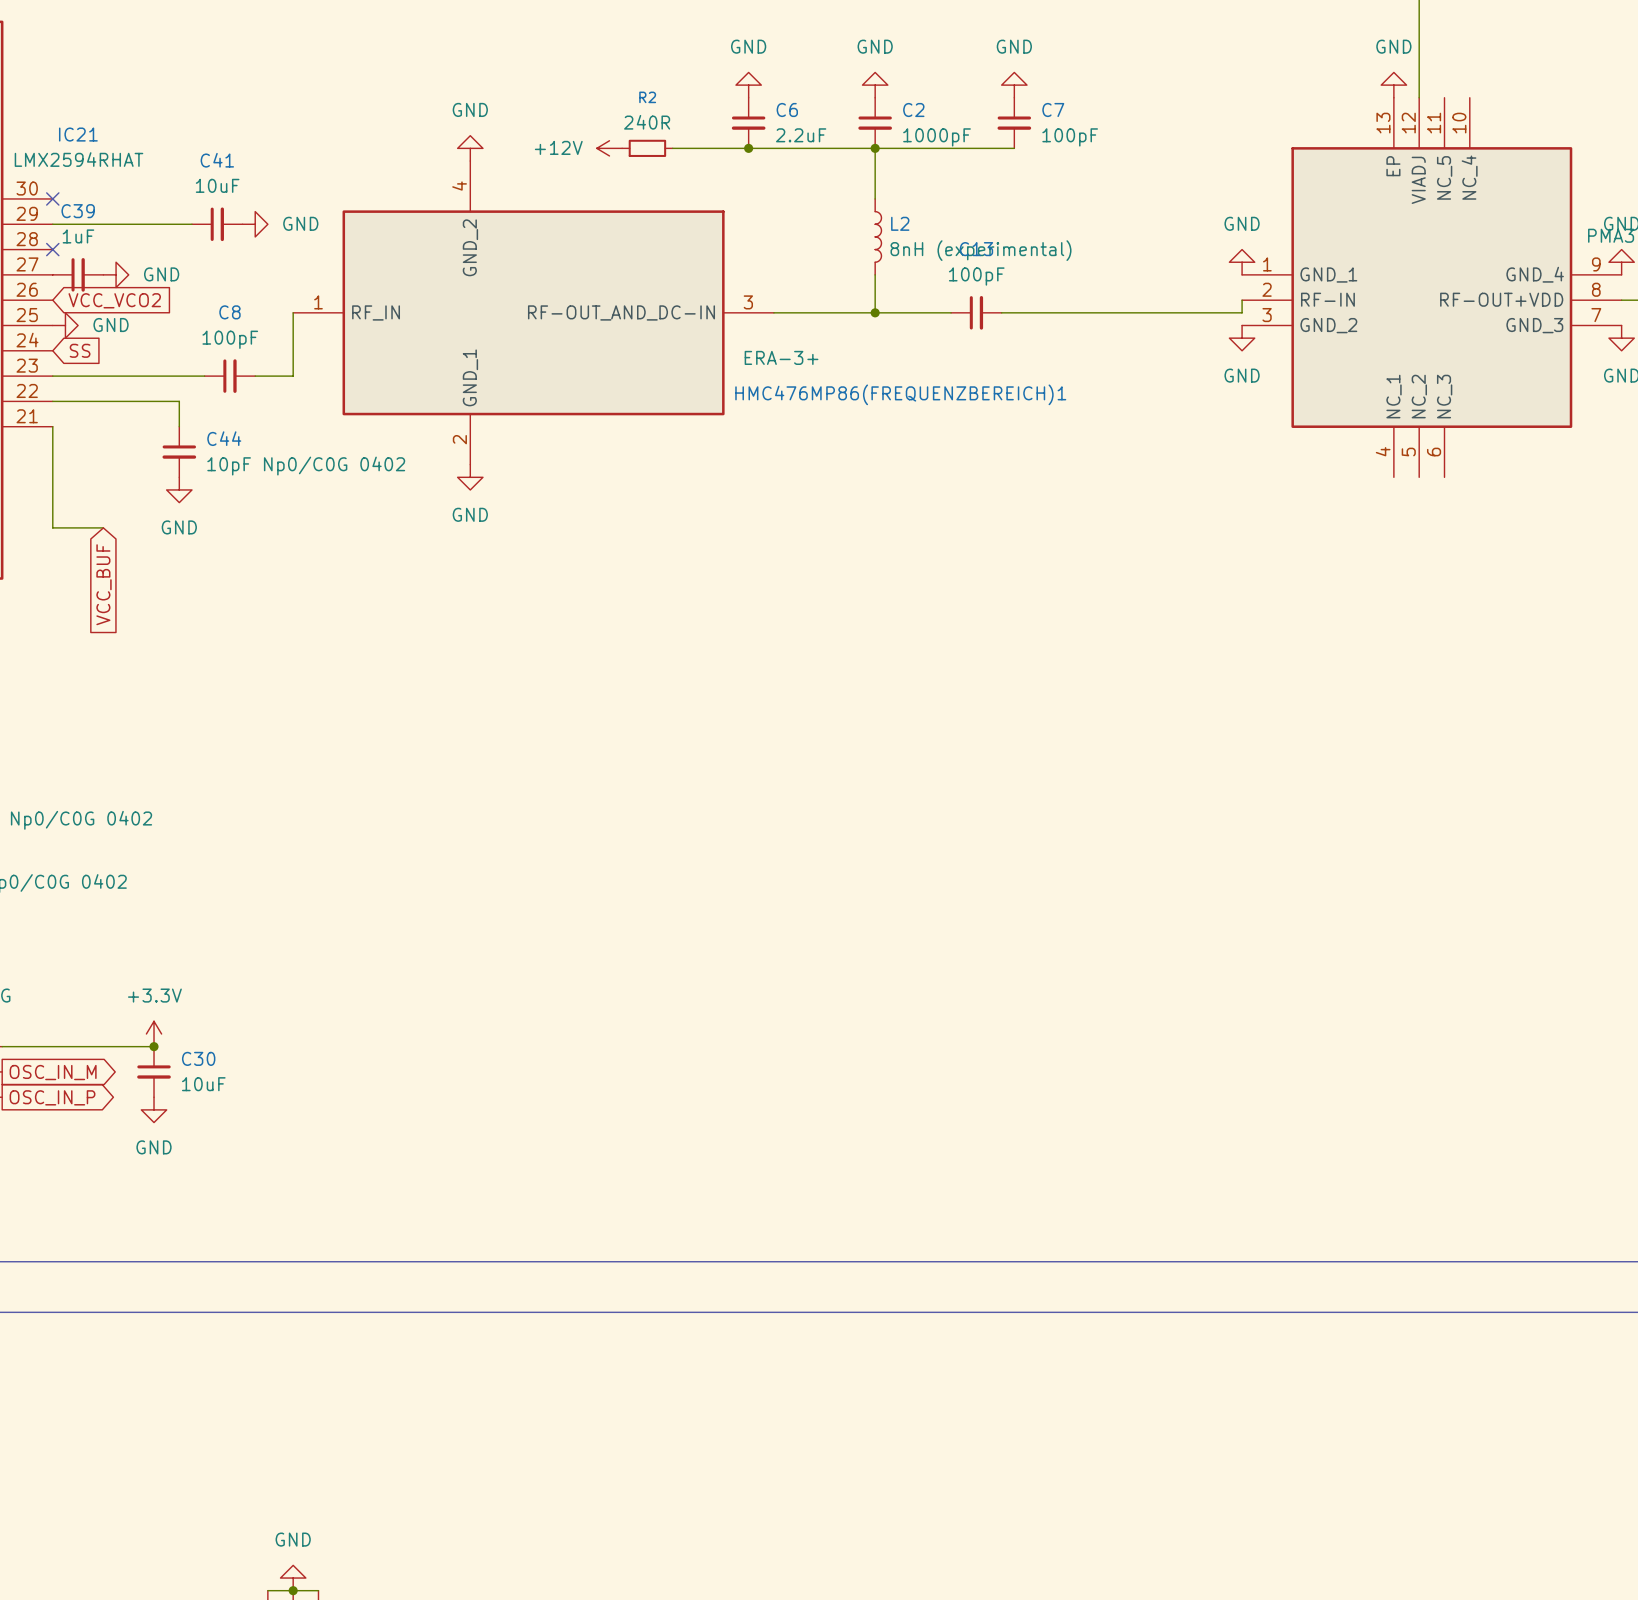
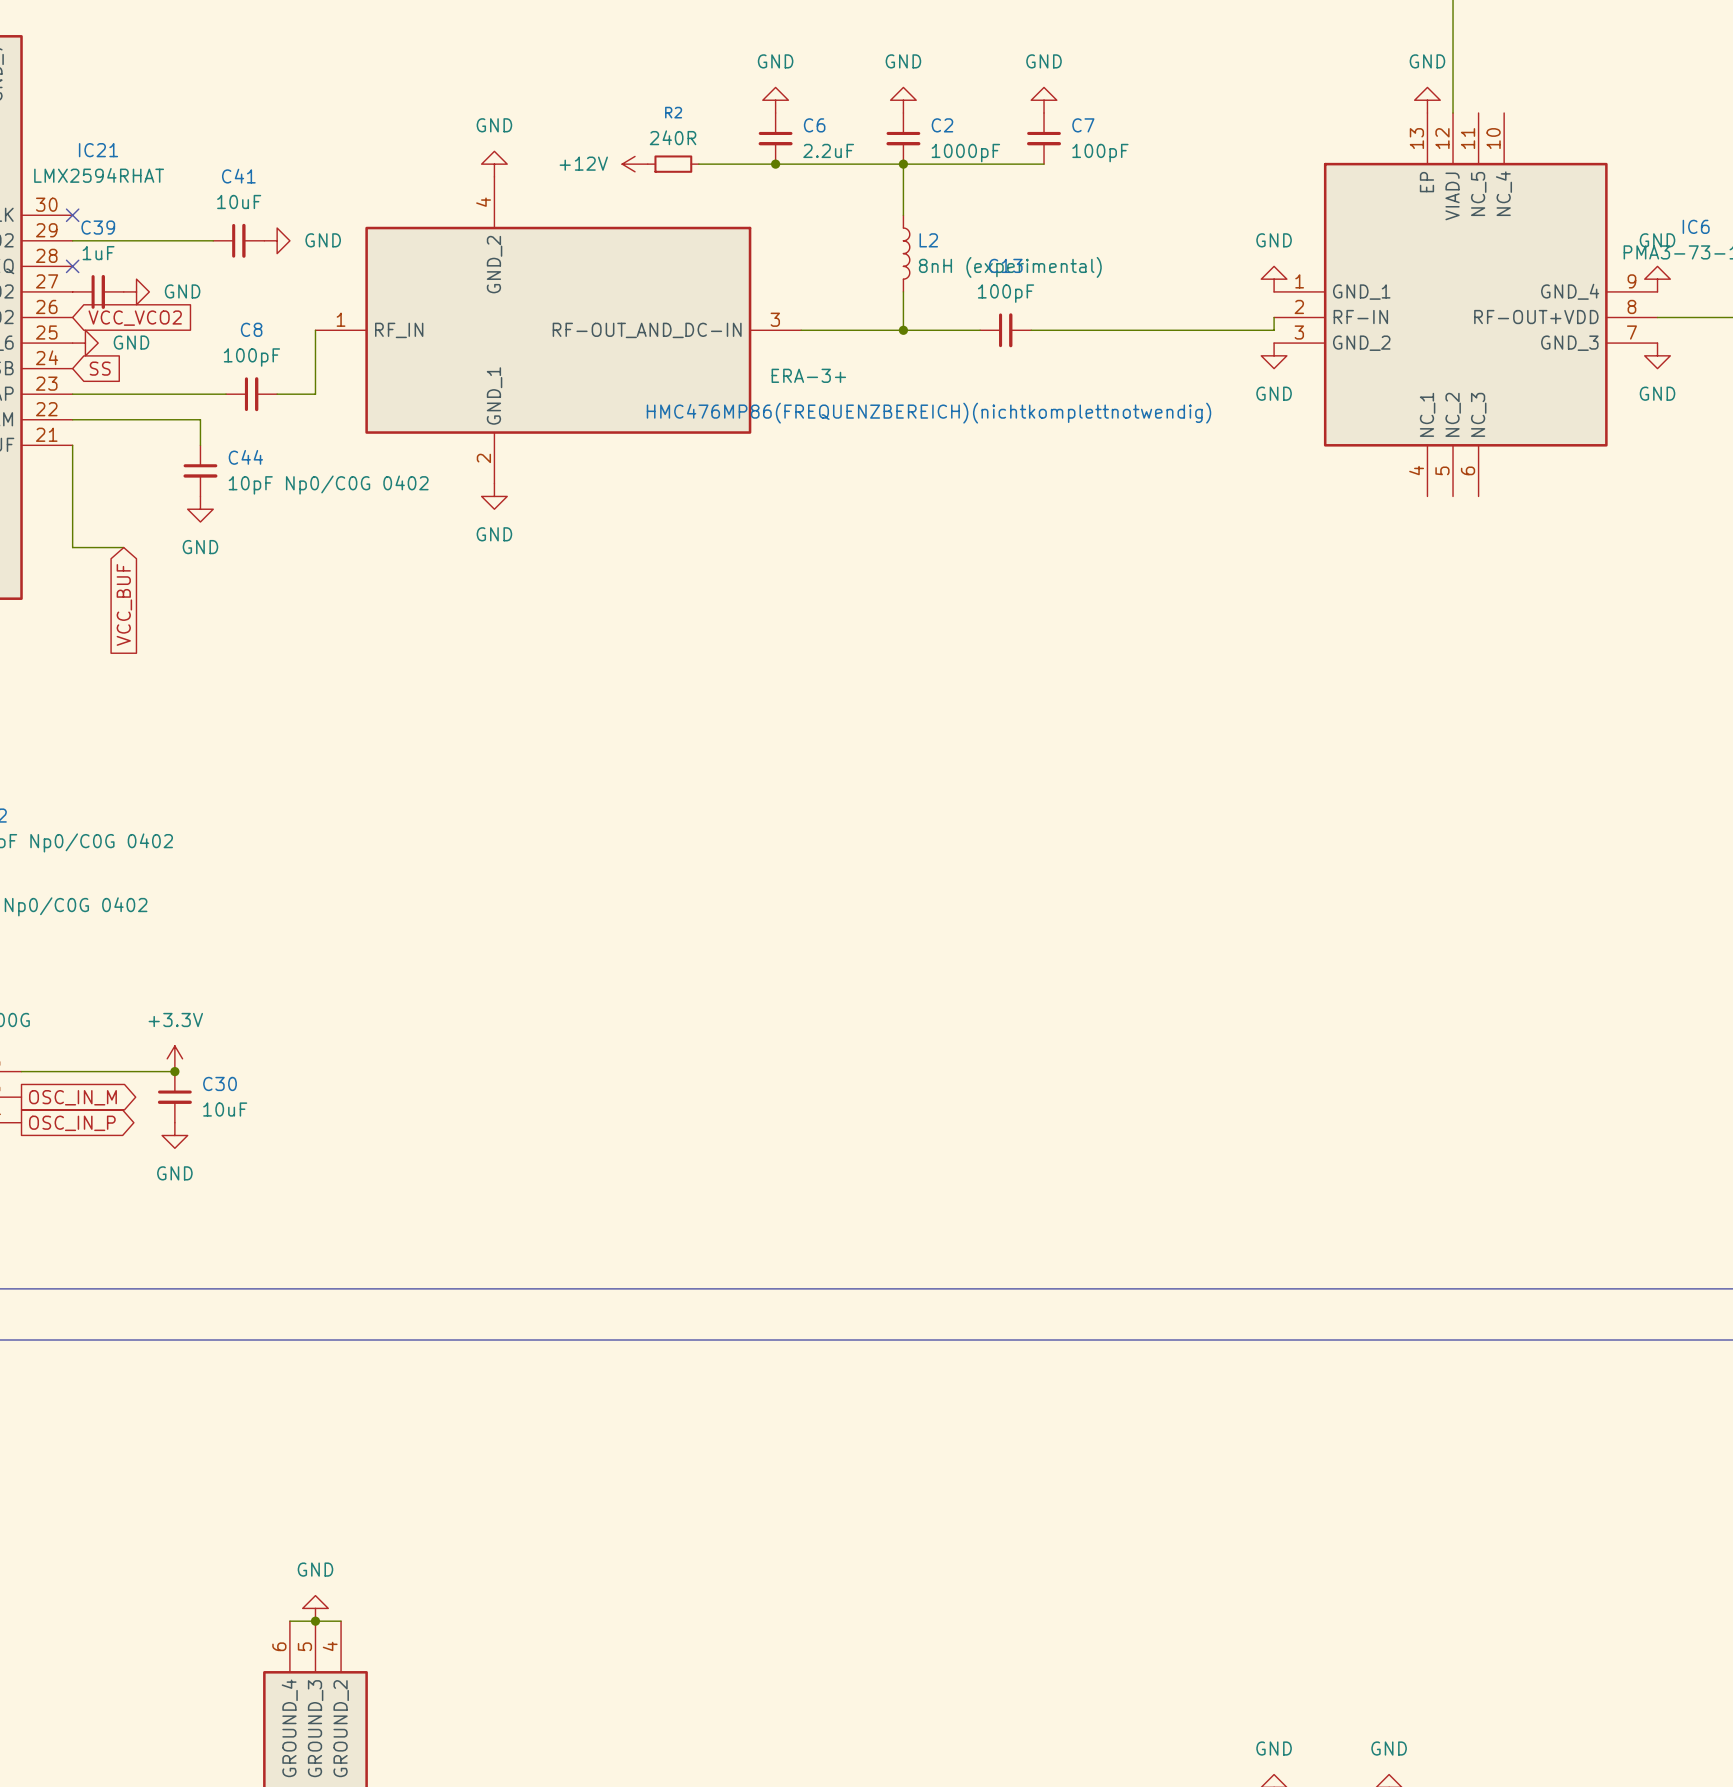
HMC476MP86(FREQUENZBEREICH)1 name: HMC476MP86(FREQUENZBEREICH)1 (900, 394) -> HMC476MP86(FREQUENZBEREICH)(nichtkomplettnotwendig) (928, 413)

